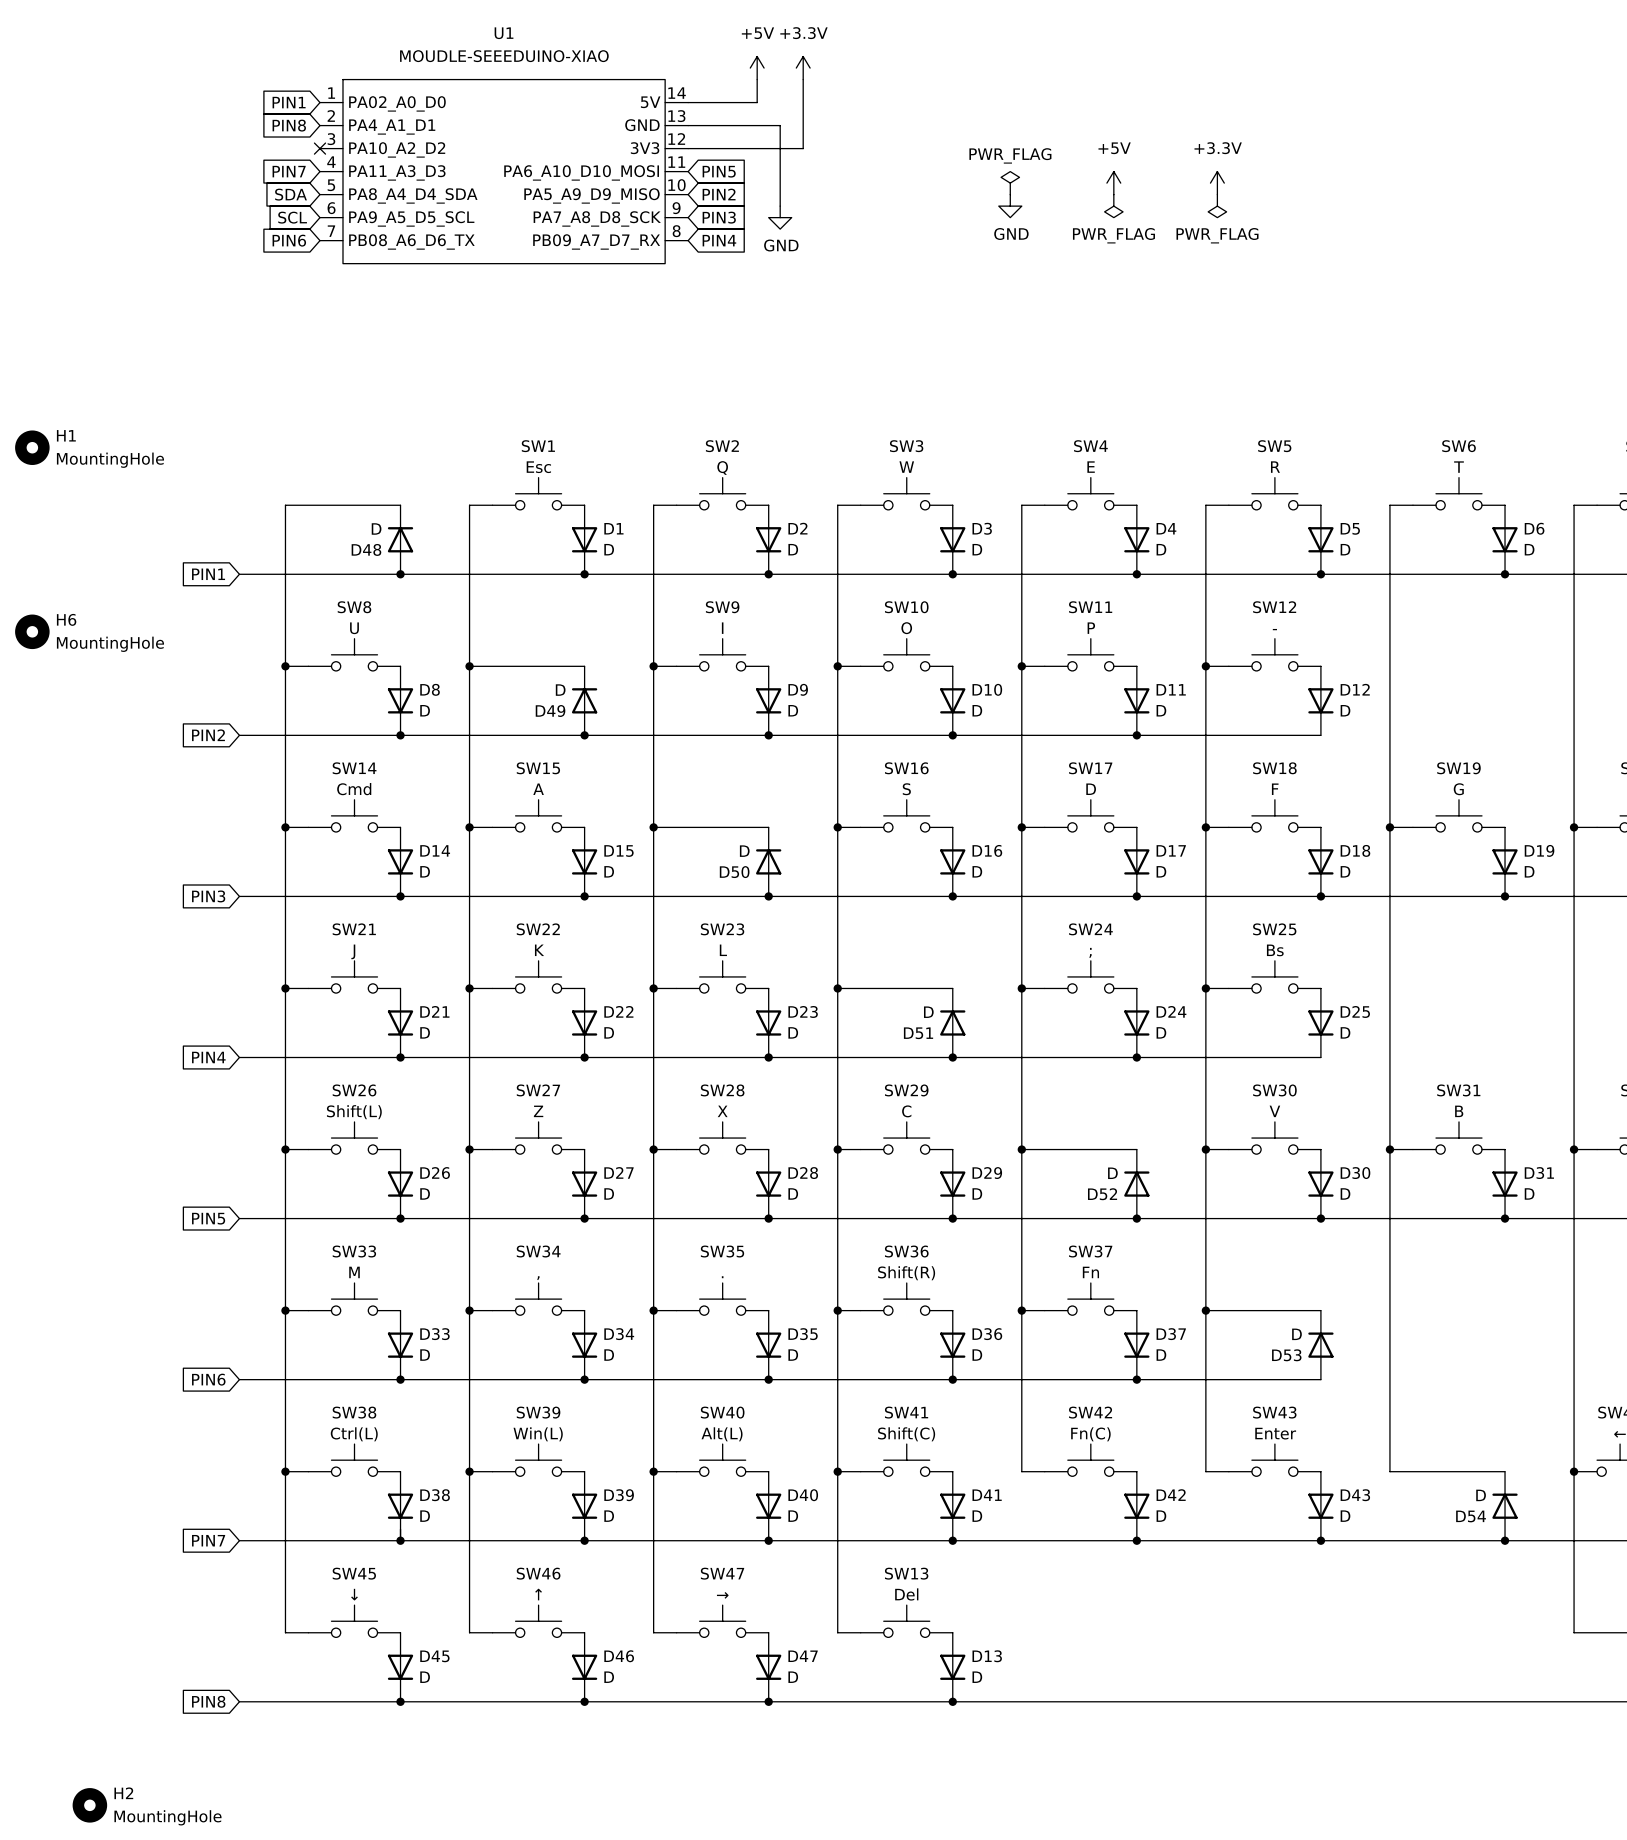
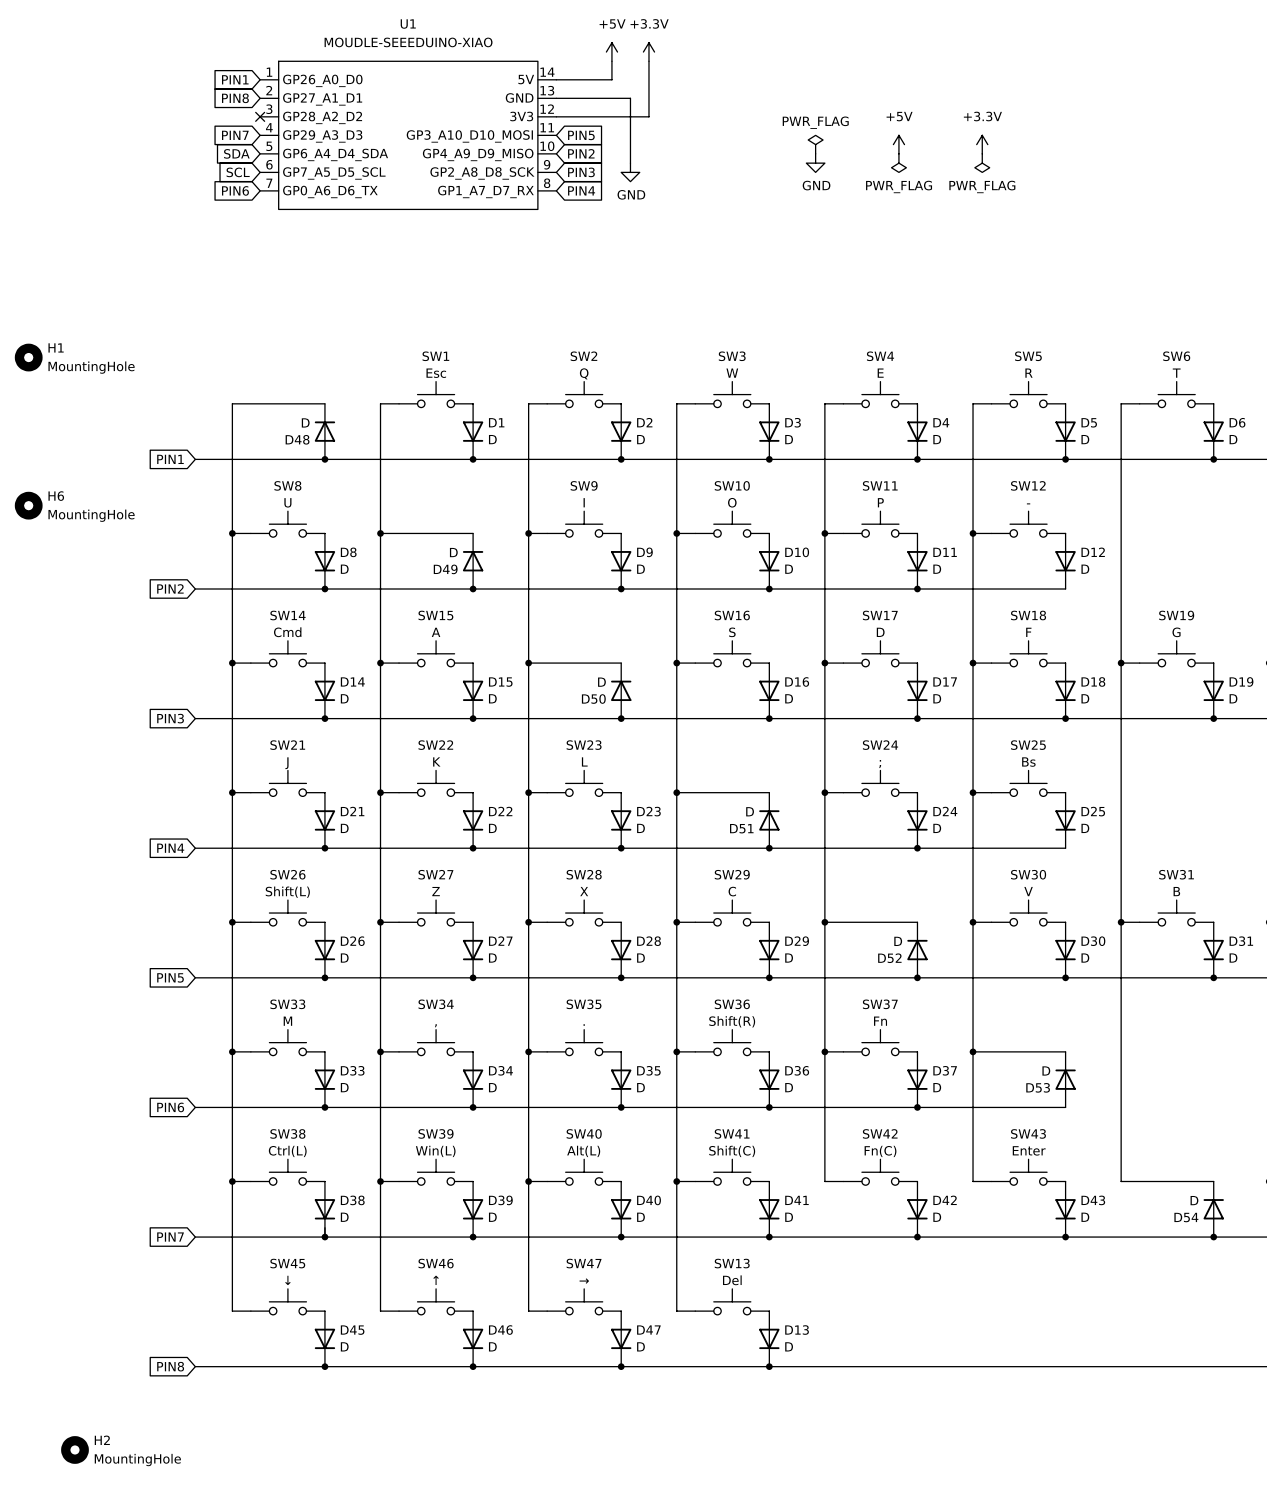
part symbol: [319, 79, 689, 264] -> [260, 61, 557, 210]

